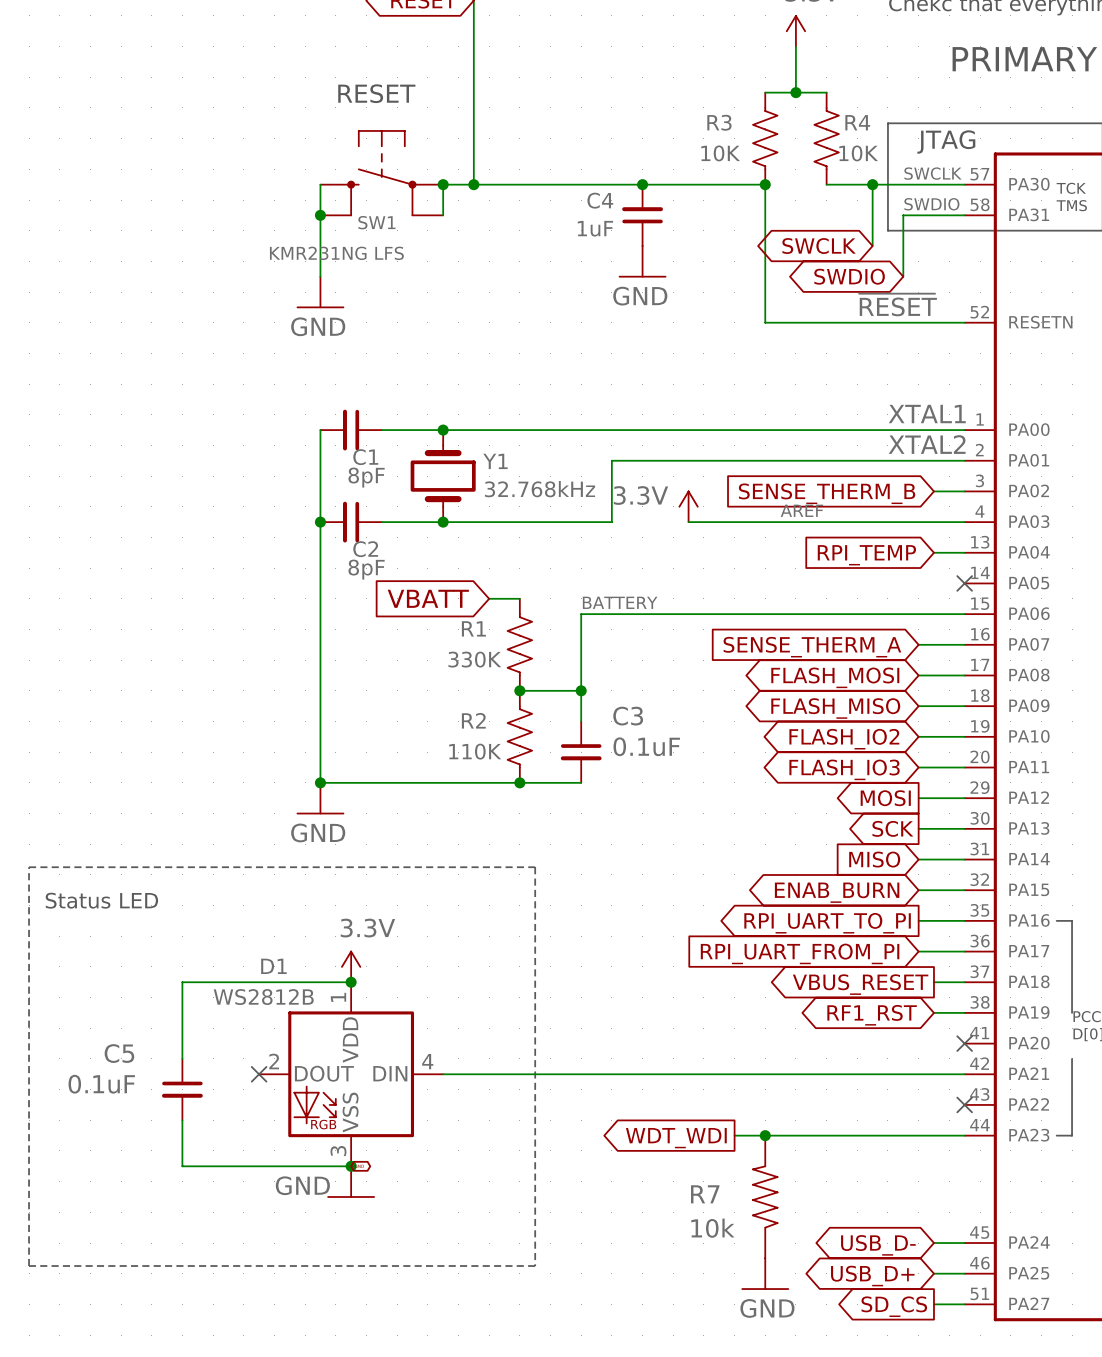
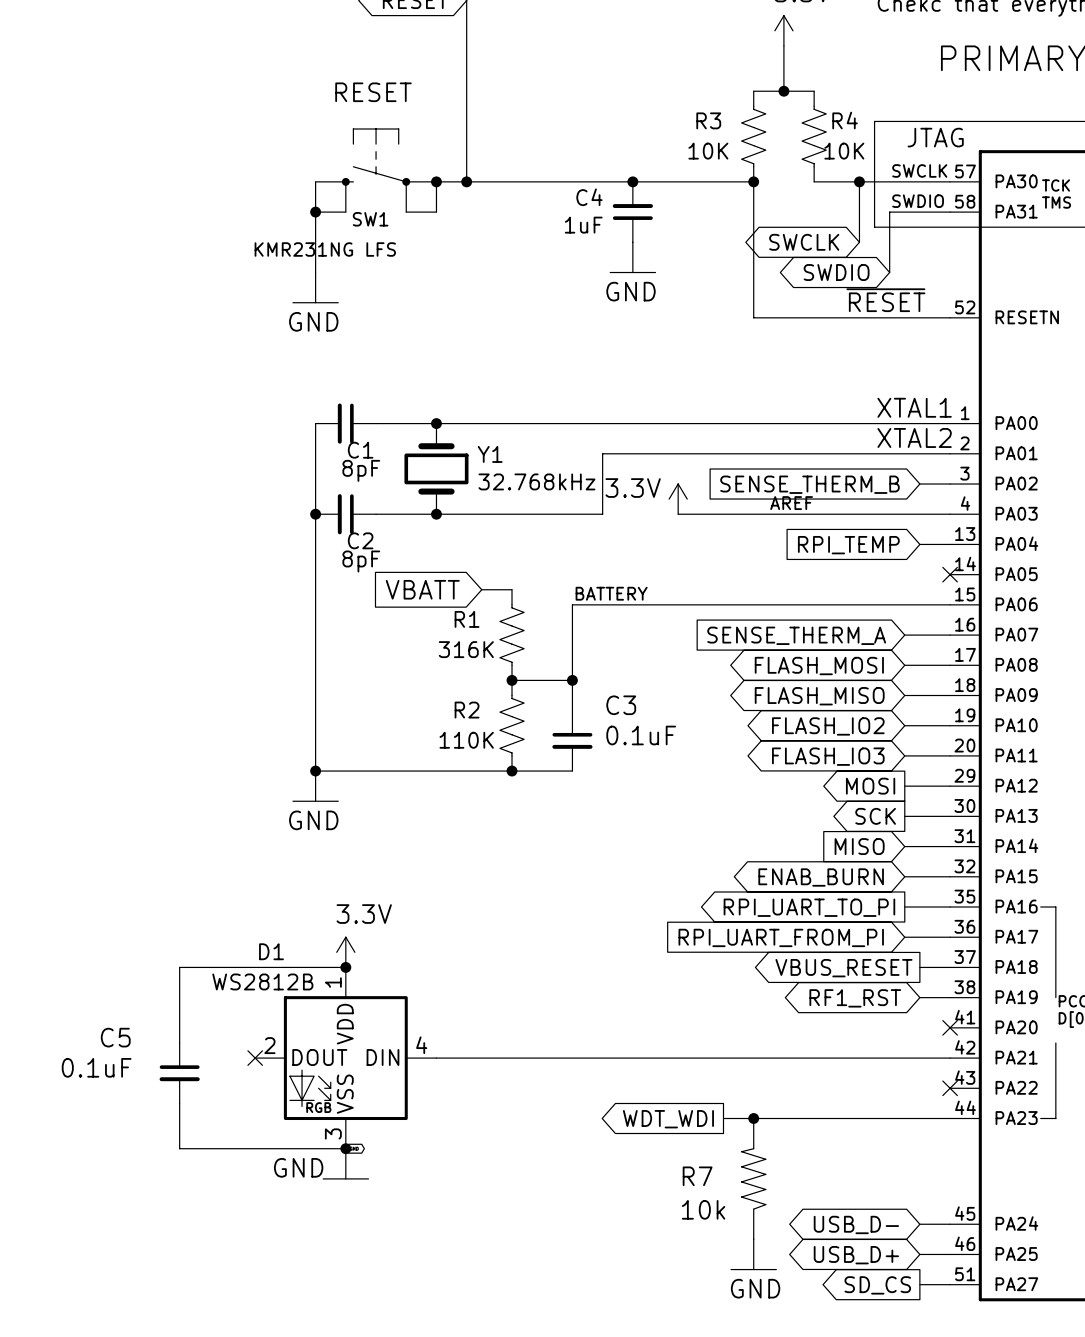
R1 value: 330K (474, 659) -> 316K (466, 649)
line: (29, 867) (535, 867) (535, 1266) (29, 1266) (29, 867) -> none
text: Status LED (101, 900) -> none

